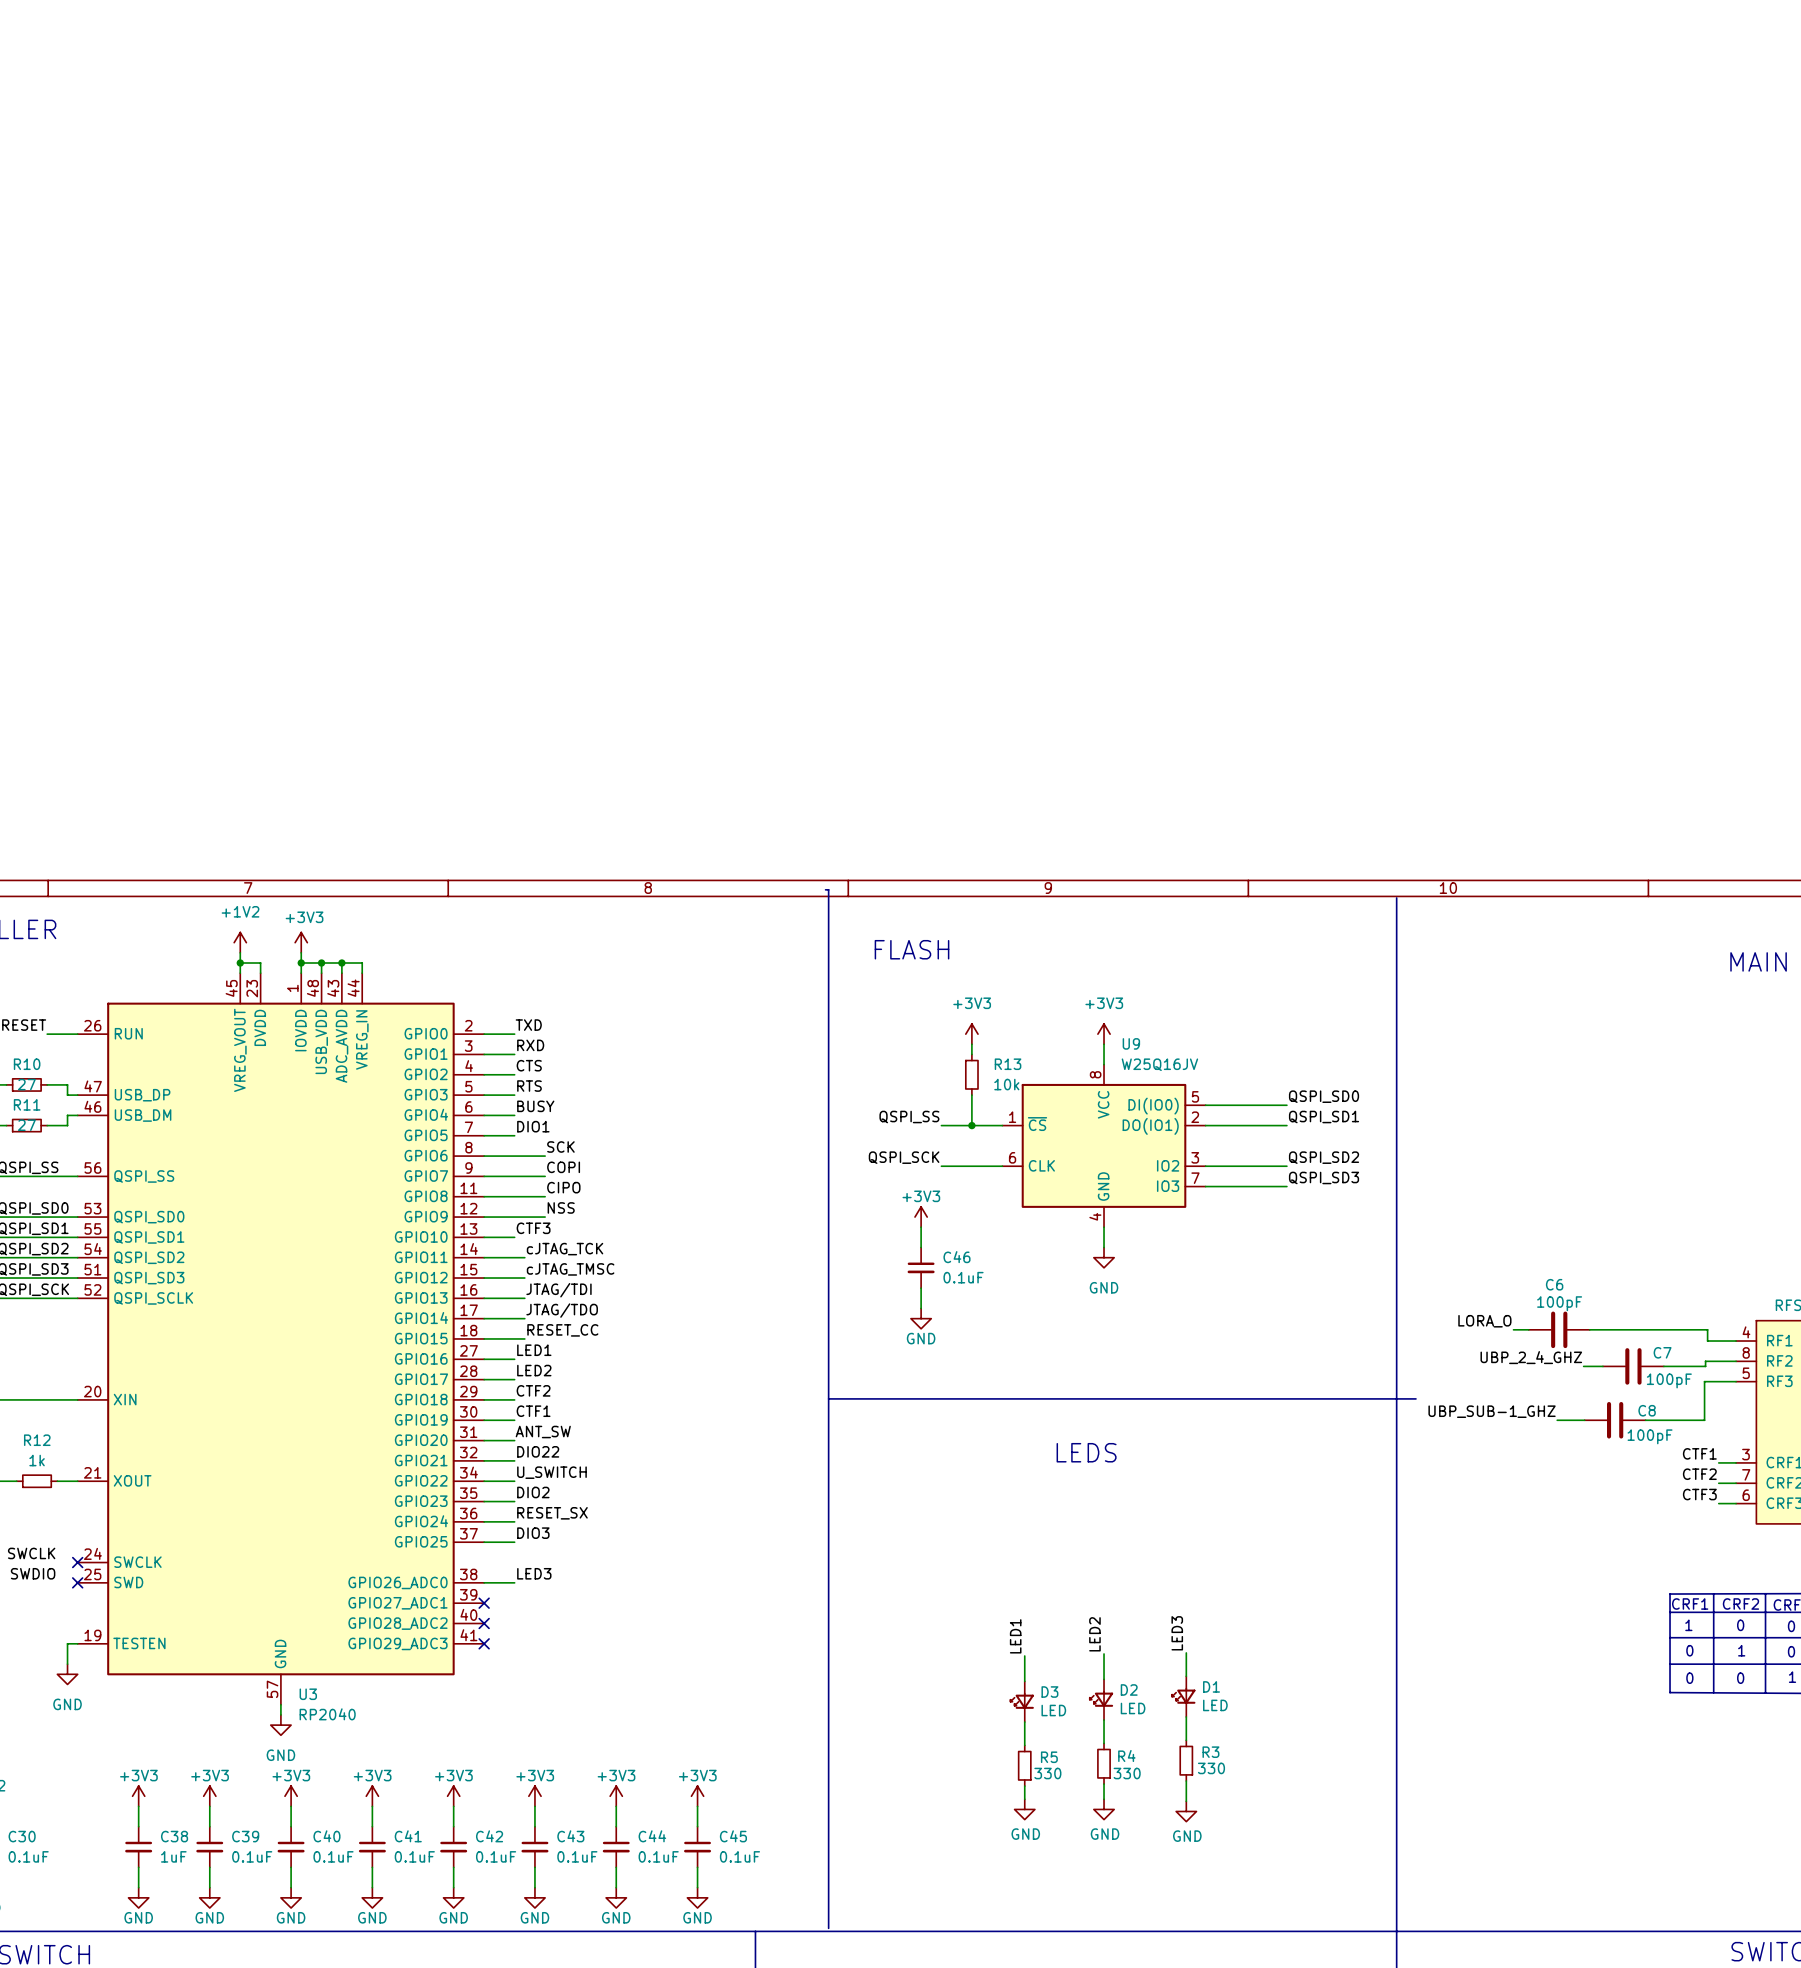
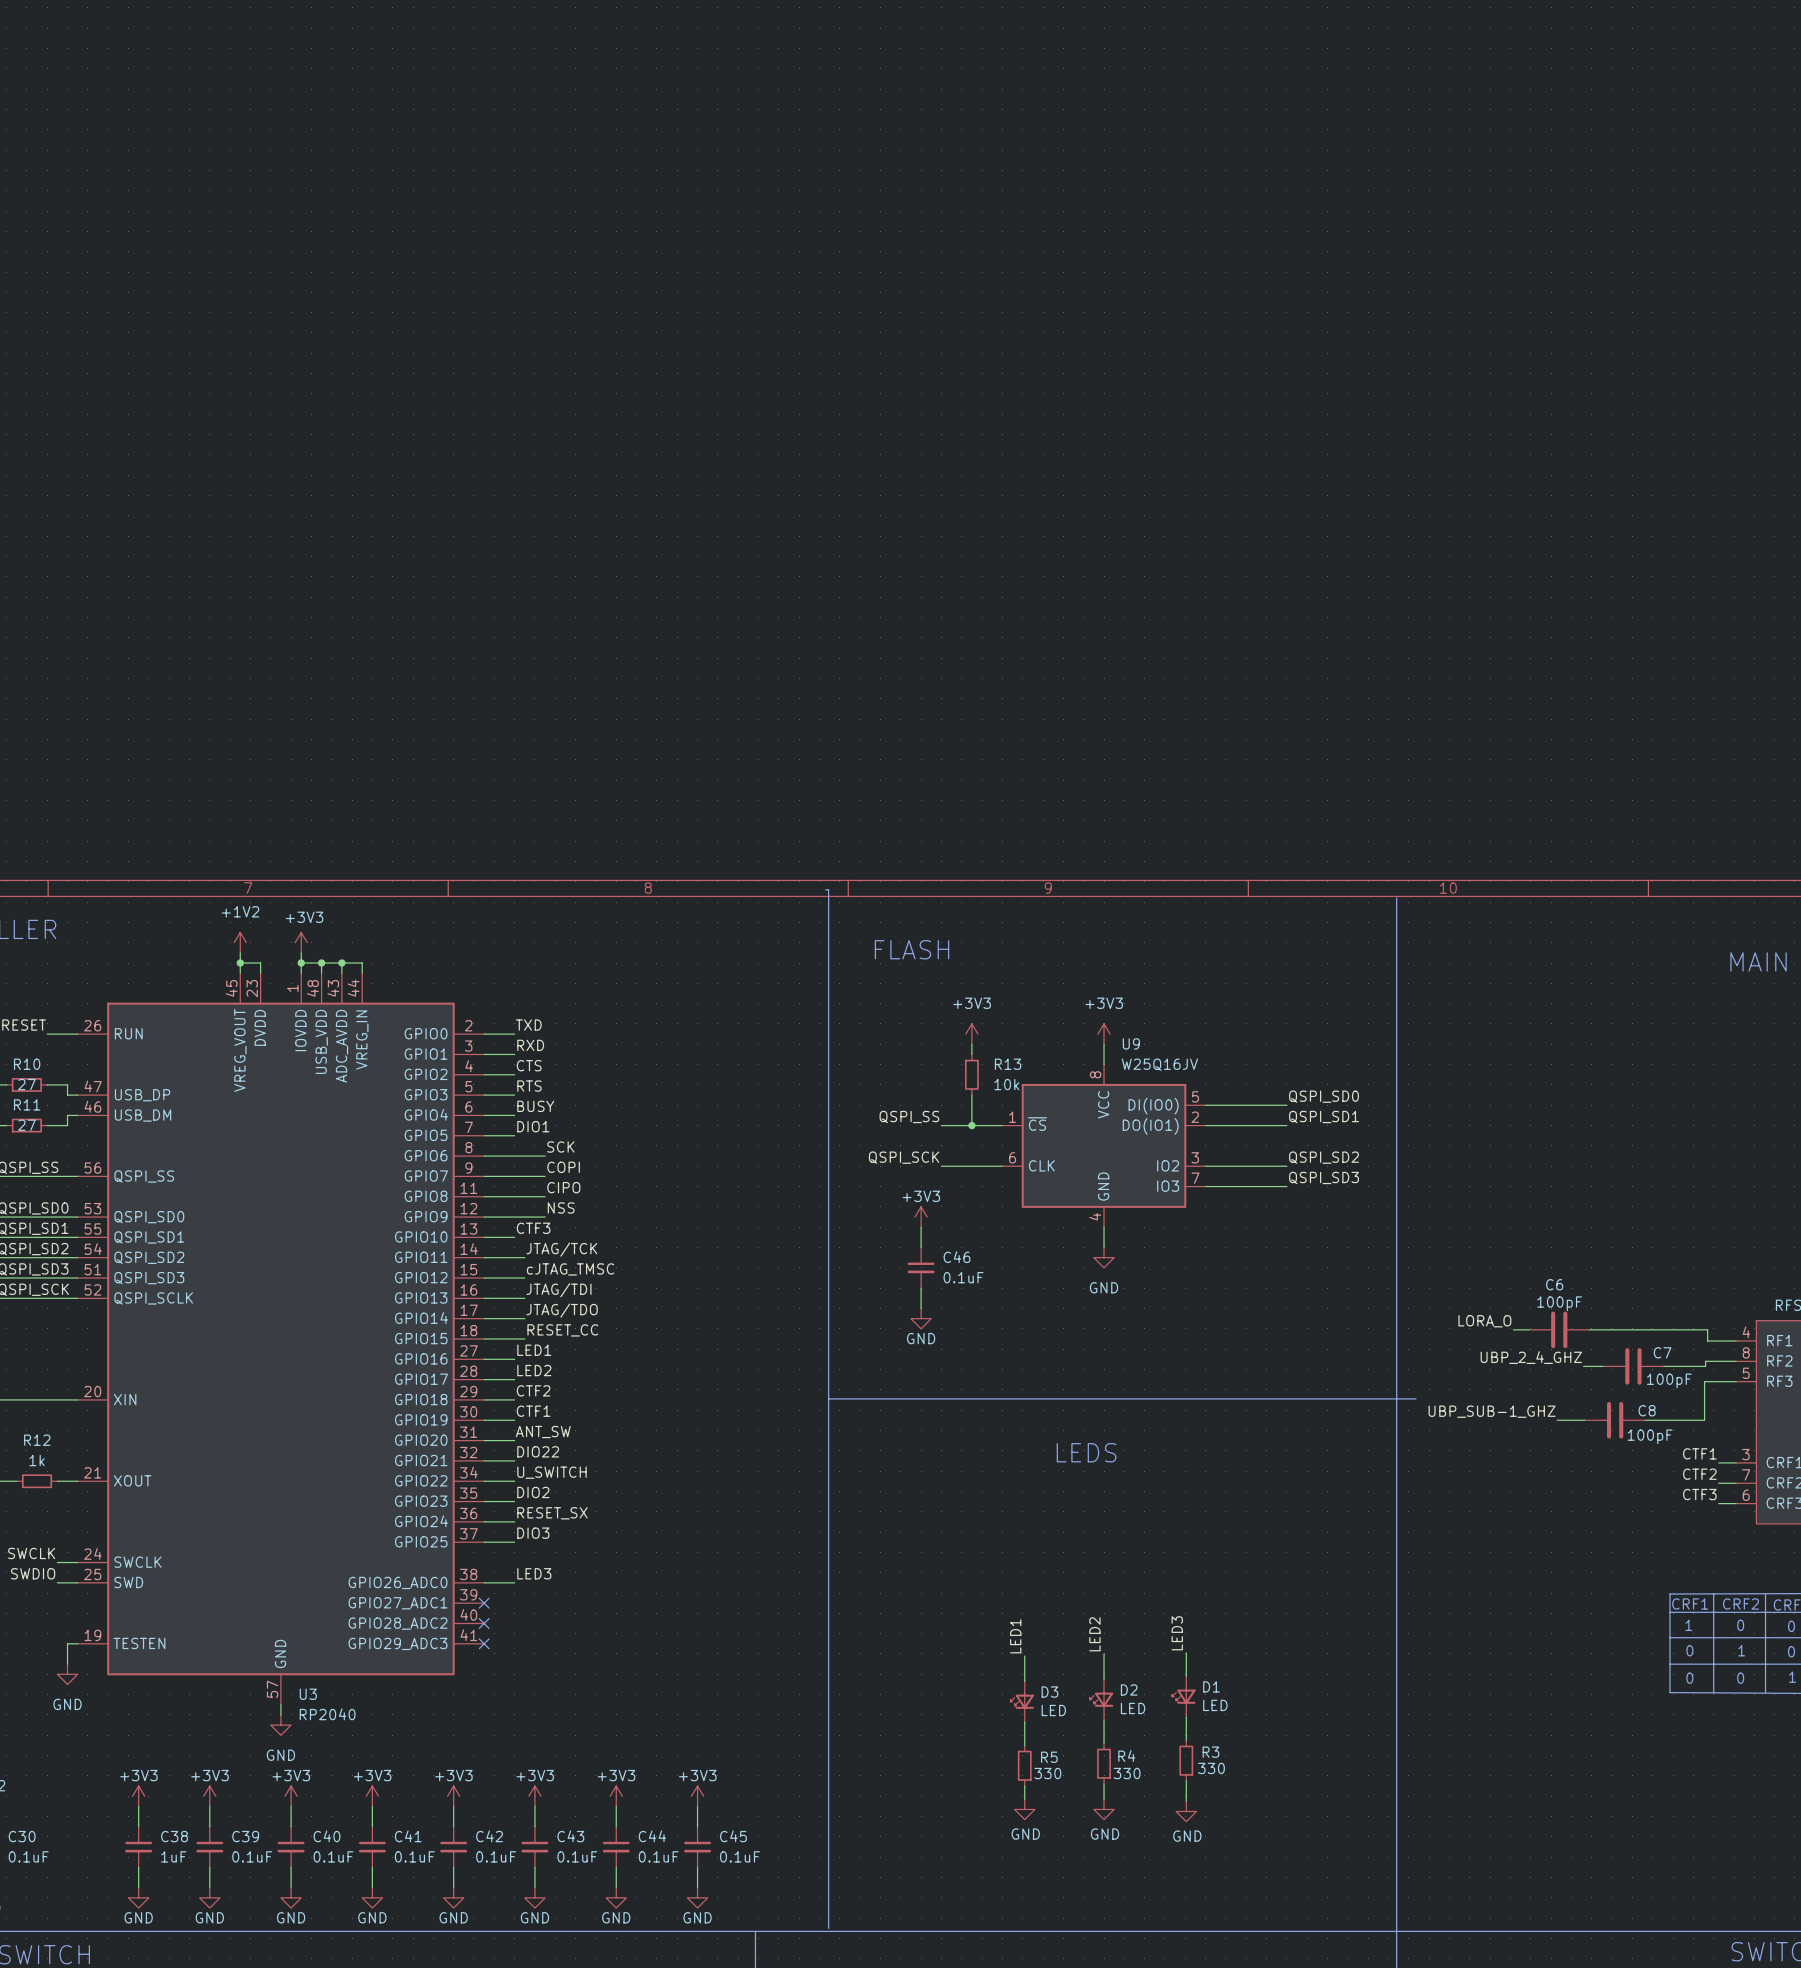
label: cJTAG_TCK (565, 1249) -> JTAG/TCK (561, 1249)
wire: none -> (57, 1562) (77, 1562)
no-connect mark: (77, 1562) -> none
wire: none -> (57, 1582) (77, 1582)
no-connect mark: (77, 1582) -> none

